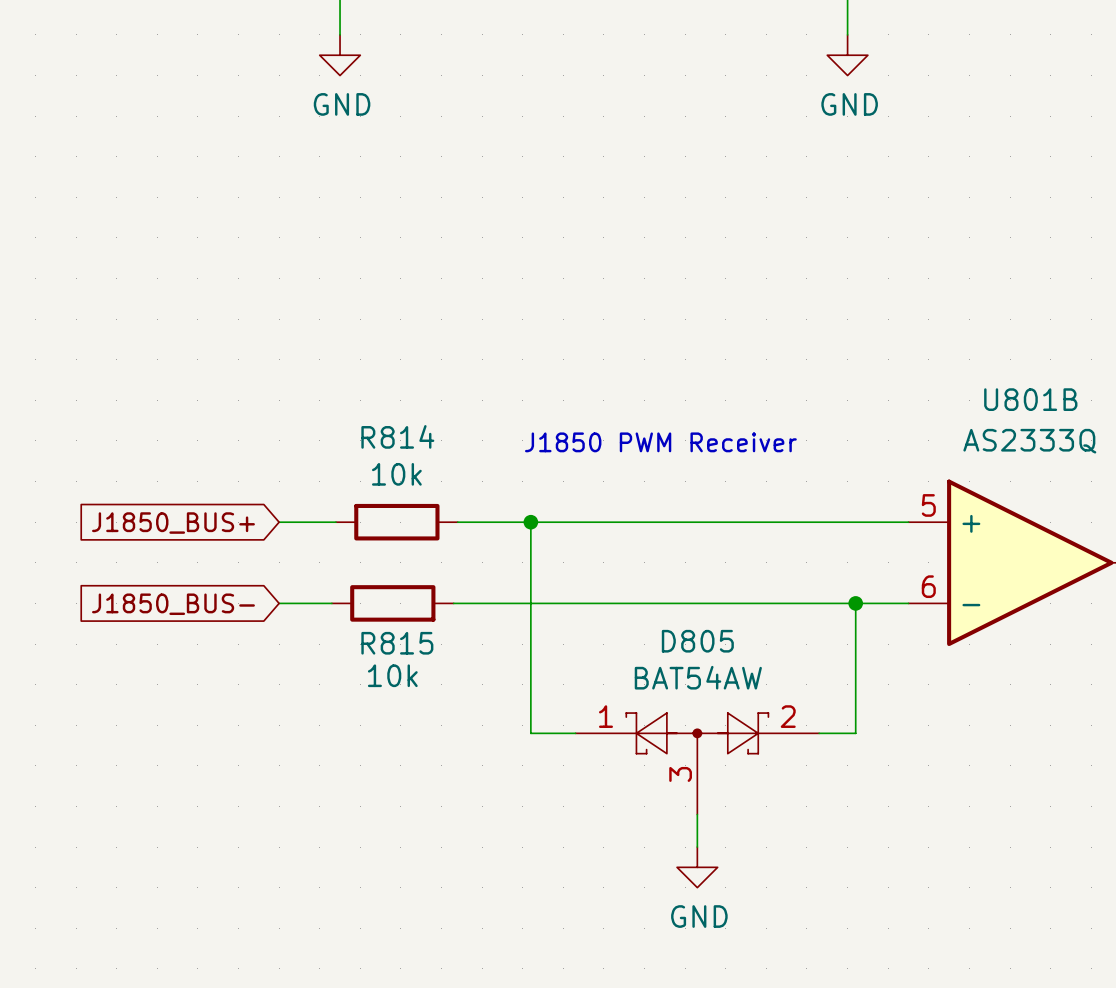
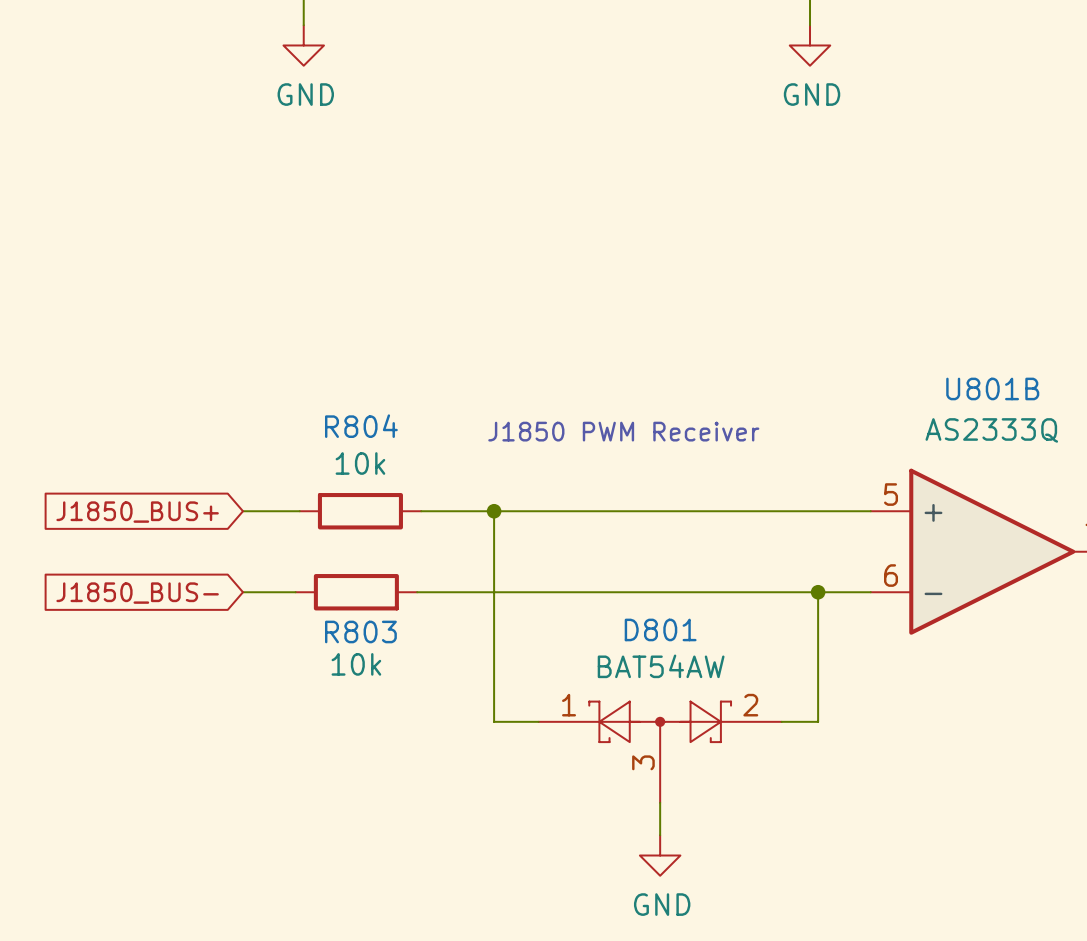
R814 name: R814 (397, 436) -> R804 (361, 426)
D805 name: D805 (697, 641) -> D801 (660, 629)
R815 name: R815 (397, 643) -> R803 (360, 631)

